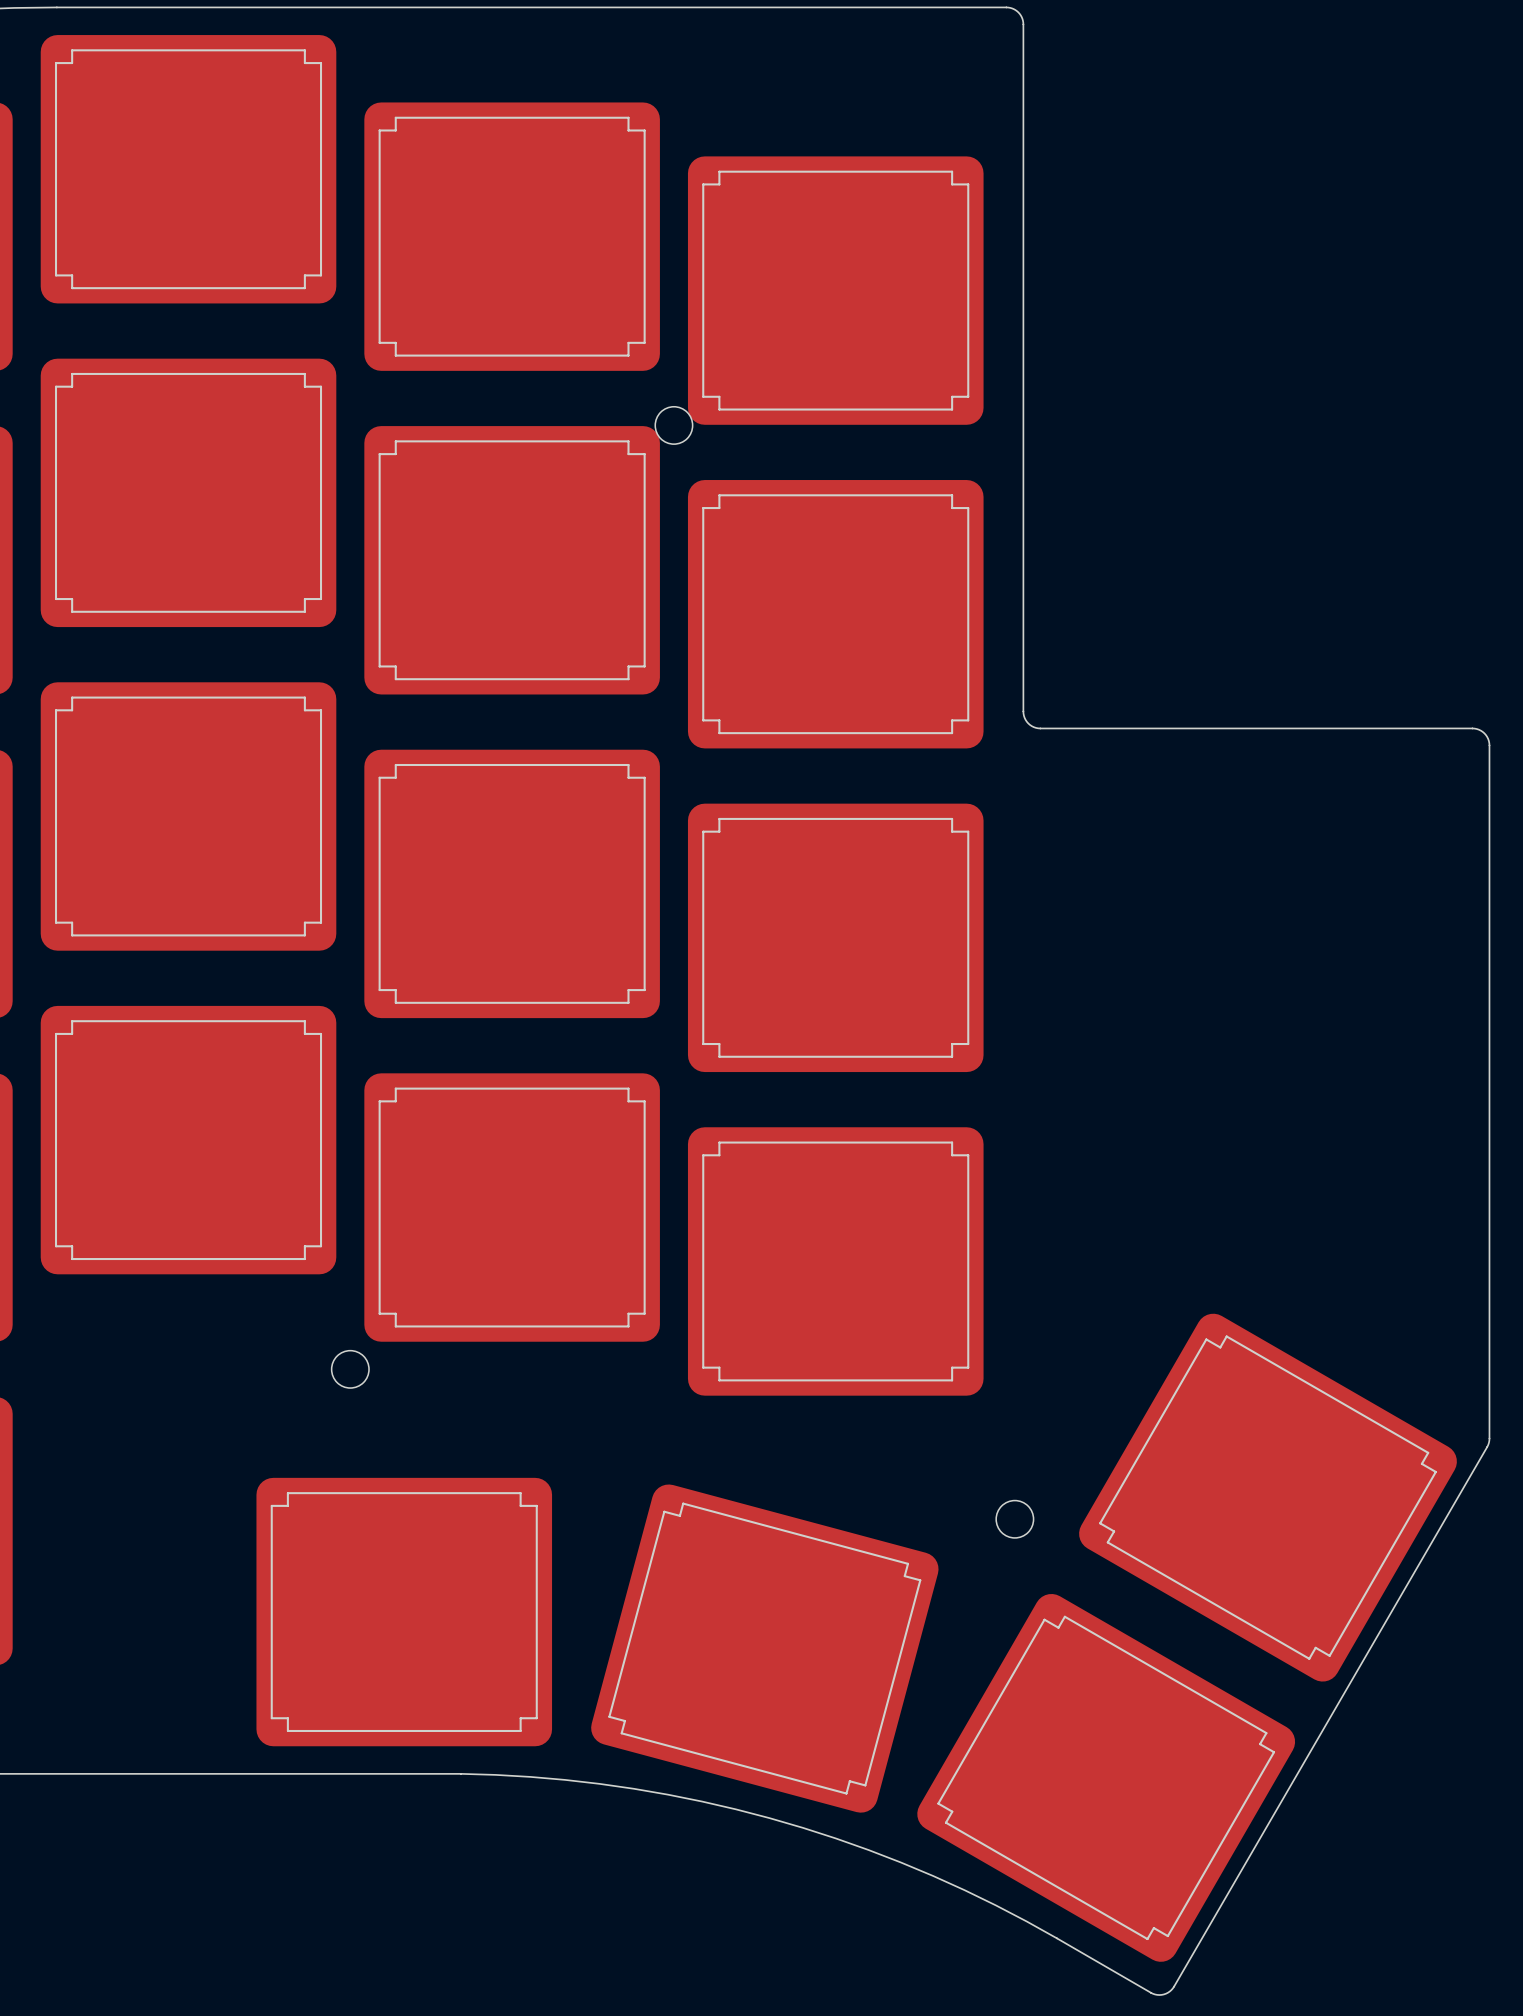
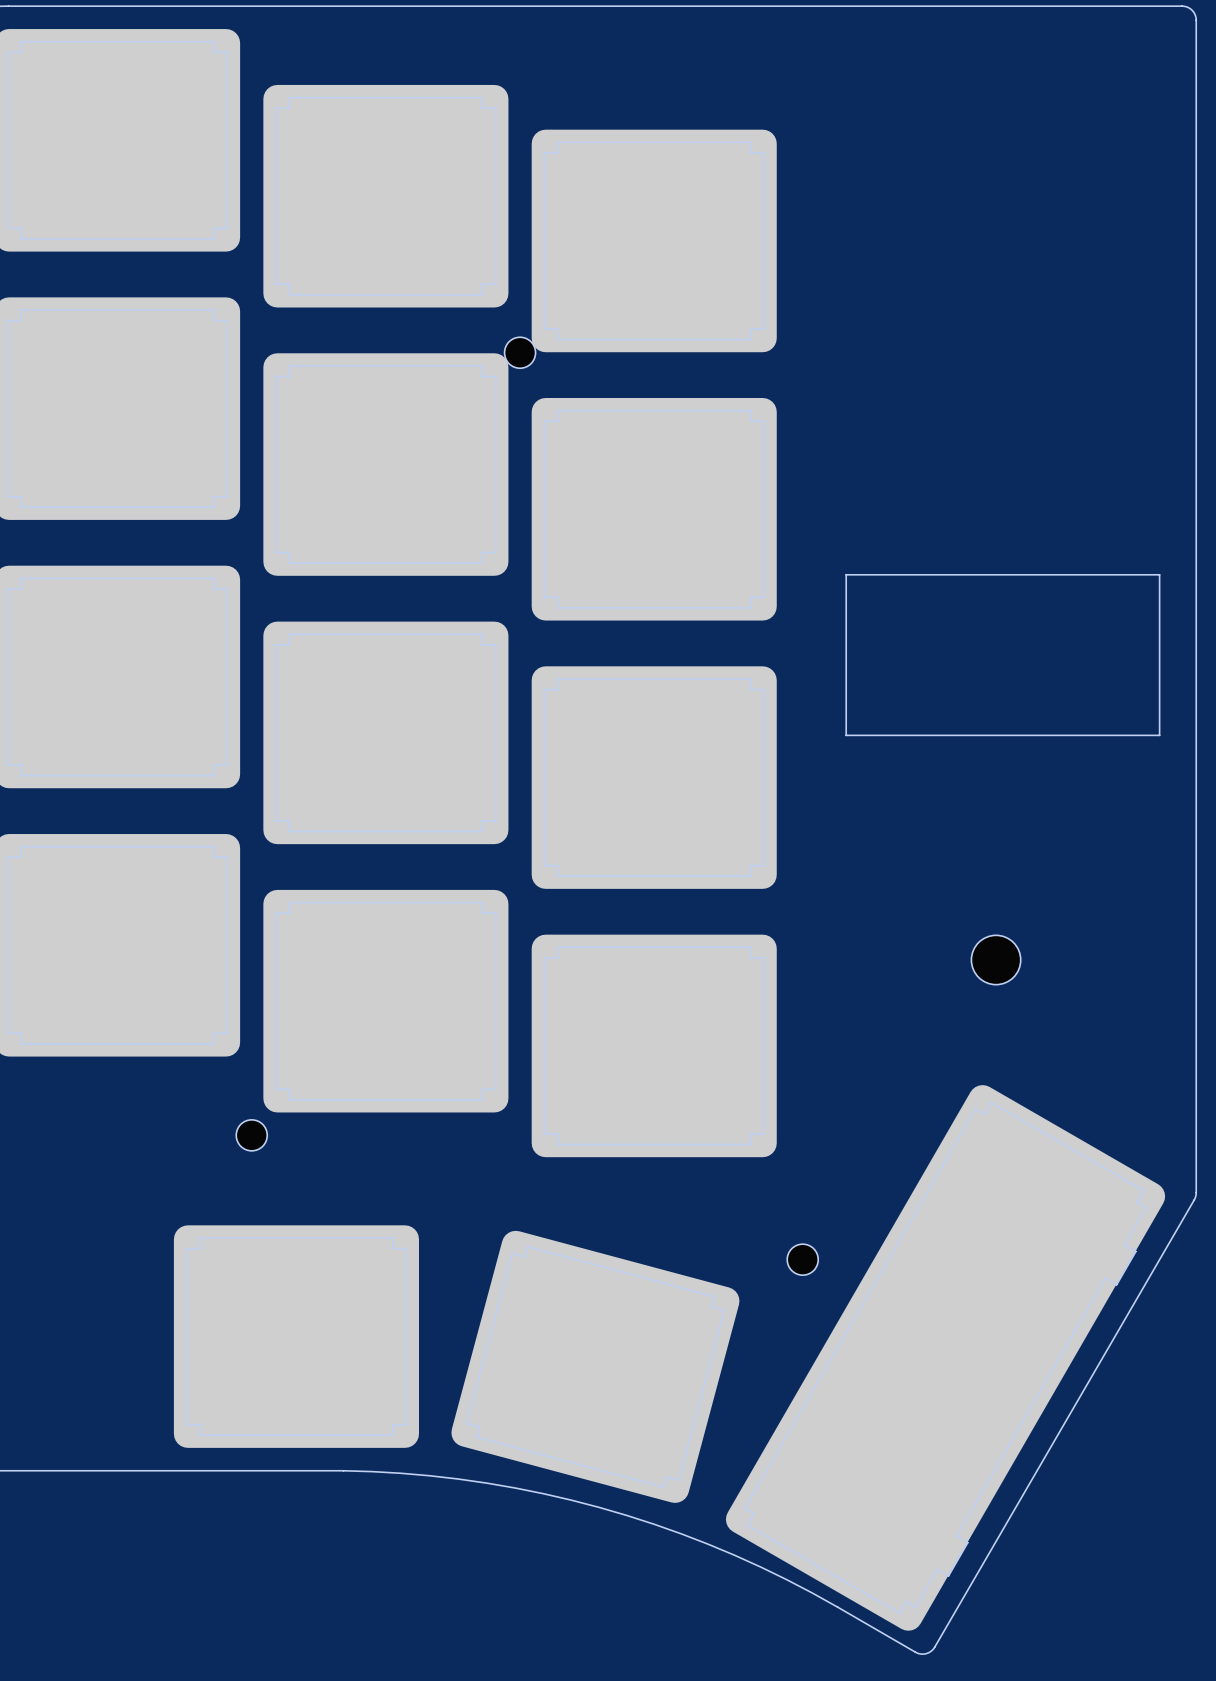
board edge: (1006, 7) (1018, 12) (1023, 24) (1023, 711) (1025, 719) (1031, 726) (1040, 728) (1472, 728) (1484, 733) (1489, 745) -> (795, 6) (1182, 6) (1189, 8) (1194, 13) (1196, 20) (1196, 618)
board edge: none -> (846, 574) (1159, 574) (1159, 735) (846, 735) (846, 574)
part: none -> (996, 959)
part: (1268, 1497) -> none
part: none -> (945, 1357)
part: (1106, 1777) -> none

